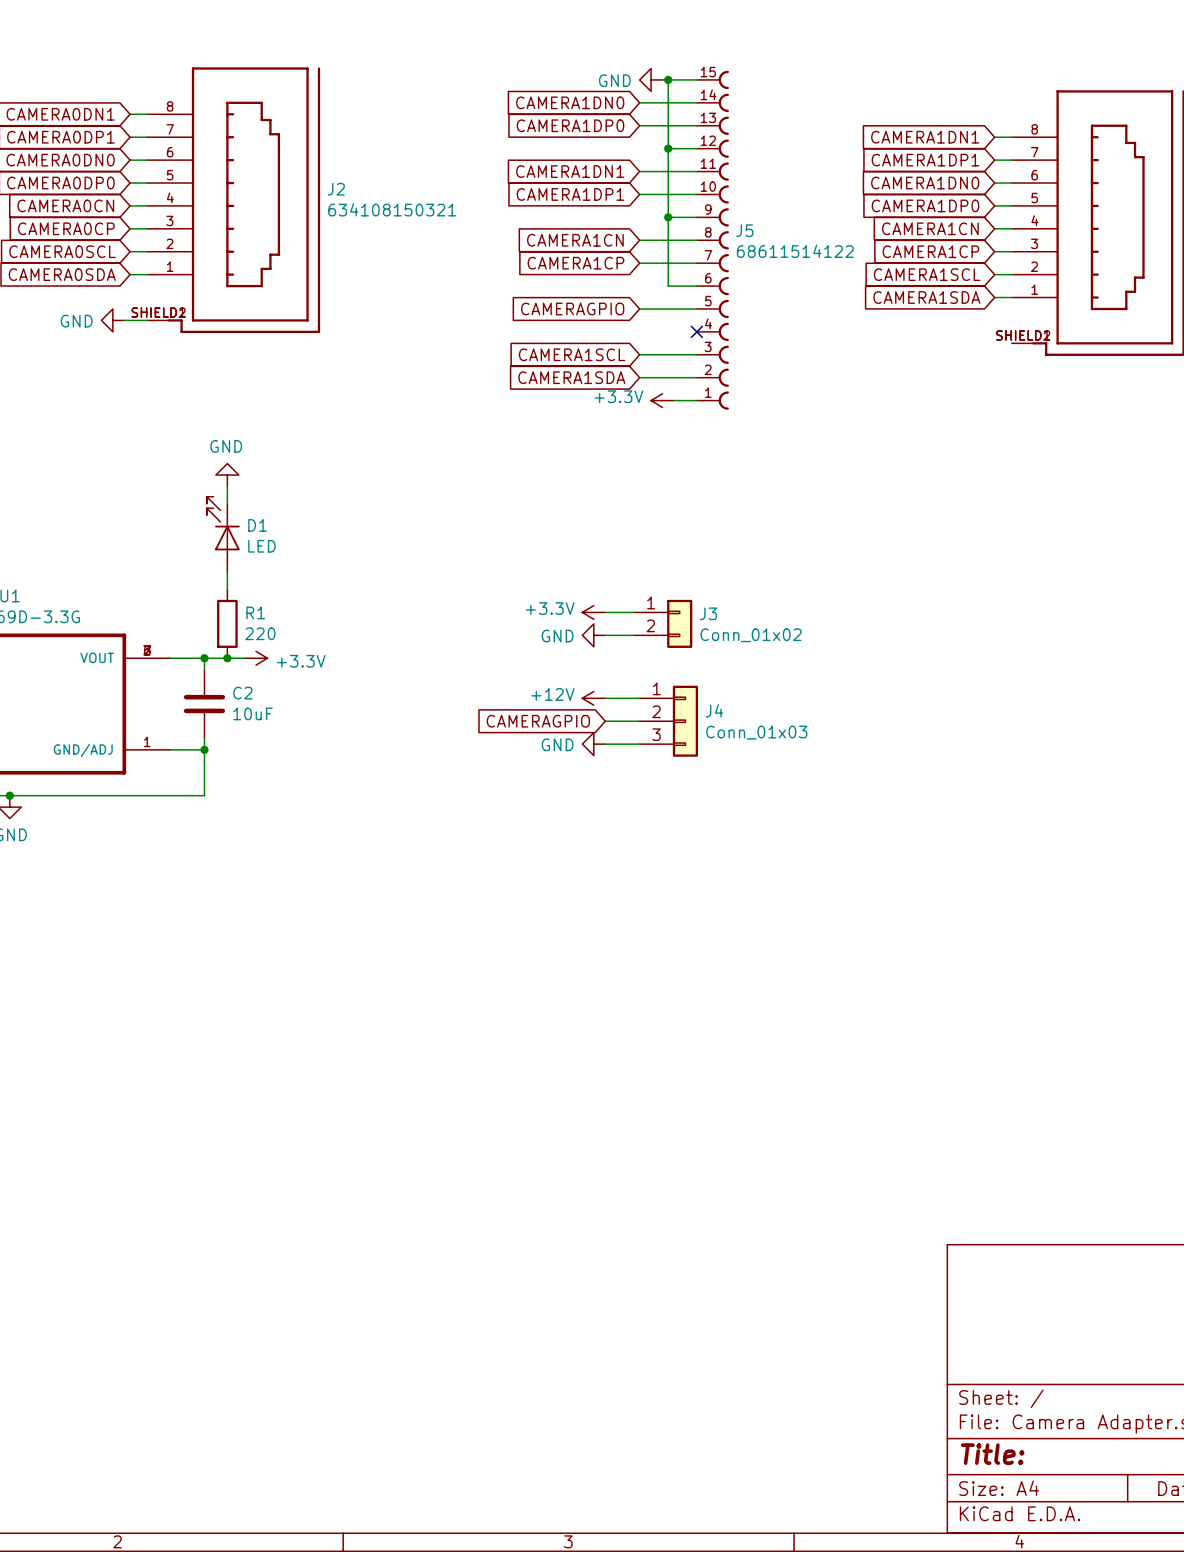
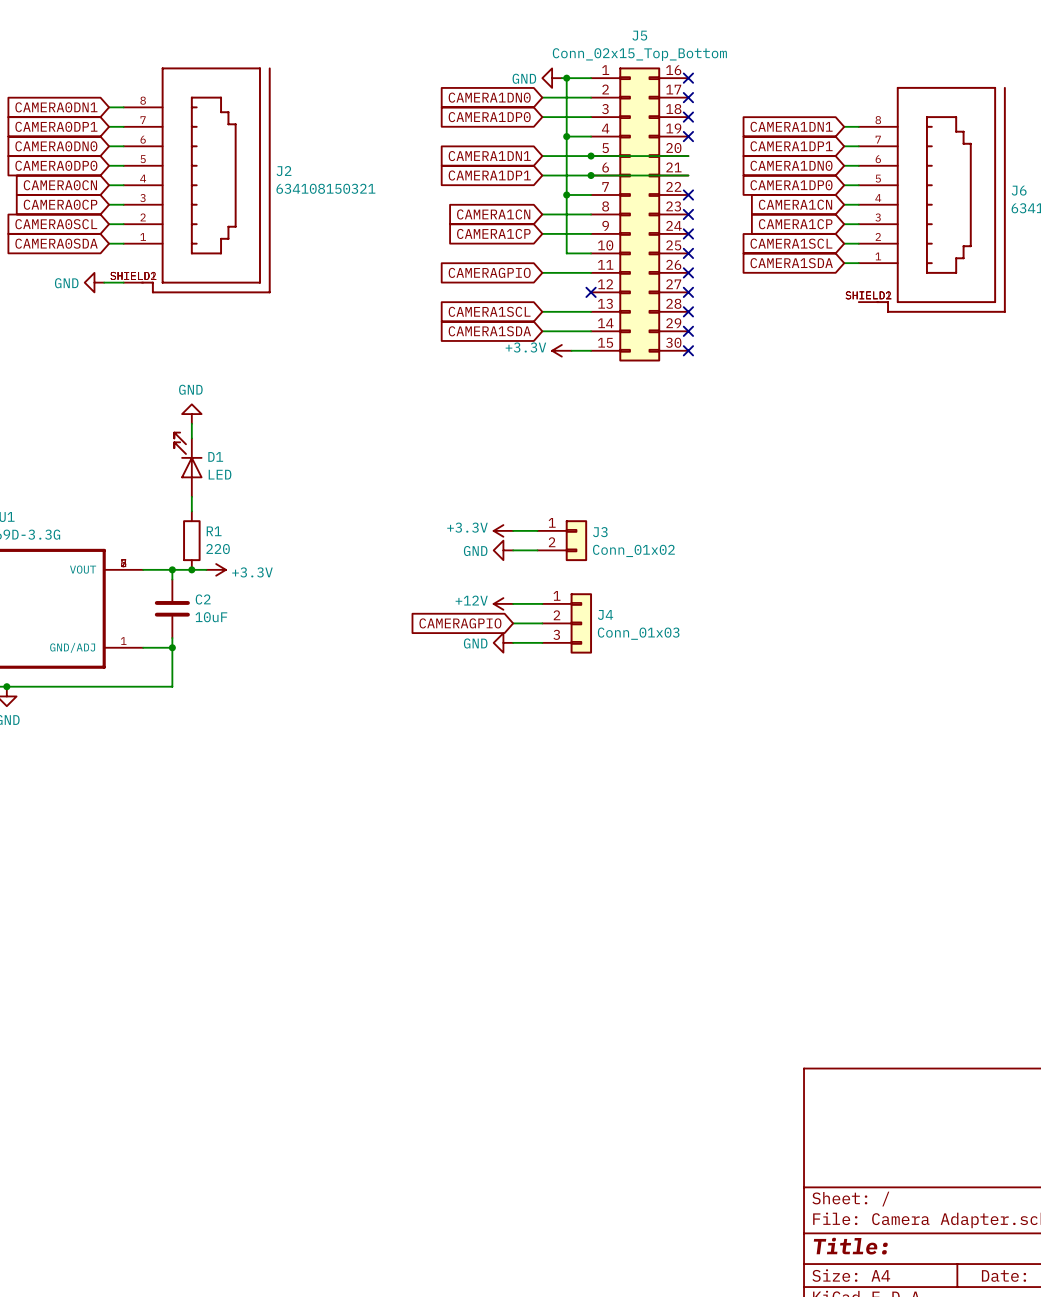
J5 symbol: [696, 70, 729, 410] -> [591, 67, 689, 362]
no-connect mark: none -> (688, 78)
no-connect mark: none -> (688, 97)
no-connect mark: none -> (688, 117)
no-connect mark: none -> (688, 136)
wire: none -> (591, 156) (688, 156)
junction: none -> (591, 156)
wire: none -> (591, 175) (688, 175)
junction: none -> (591, 175)
no-connect mark: none -> (688, 194)
J5 name position: J5 (744, 230) -> J5 (639, 35)
no-connect mark: none -> (688, 214)
J5 value: 68611514122 (795, 251) -> Conn_02x15_Top_Bottom (639, 54)
no-connect mark: none -> (688, 233)
no-connect mark: none -> (688, 253)
no-connect mark: none -> (688, 272)
no-connect mark: none -> (688, 292)
no-connect mark: none -> (688, 311)
no-connect mark: none -> (688, 331)
no-connect mark: none -> (688, 350)

